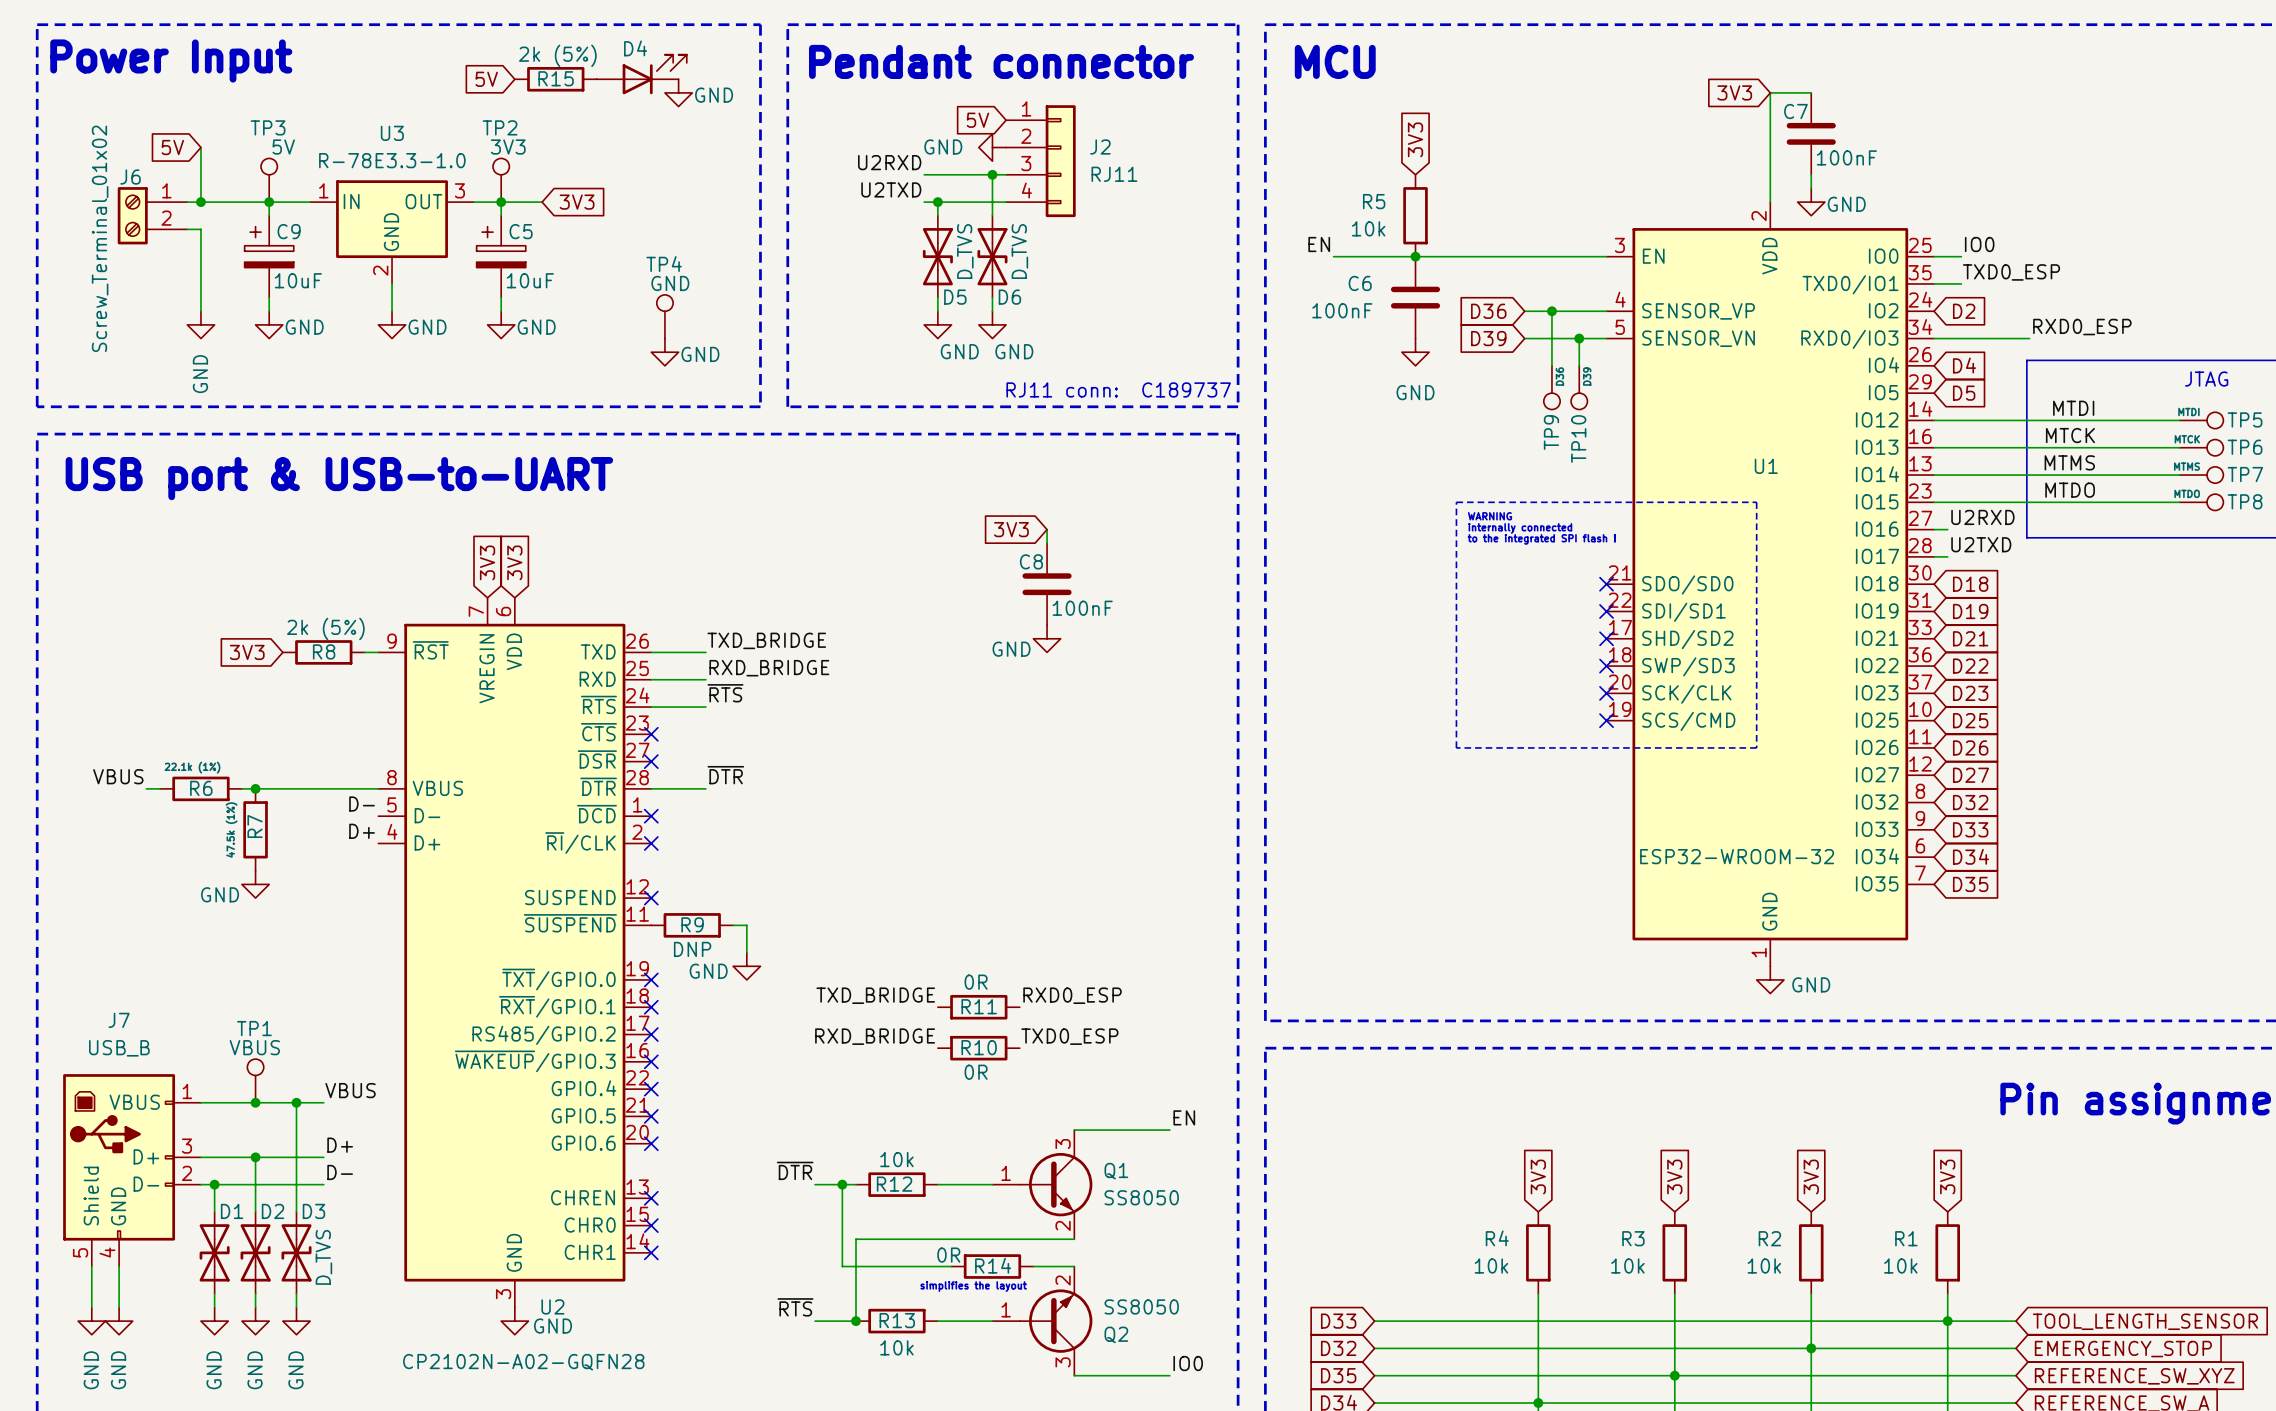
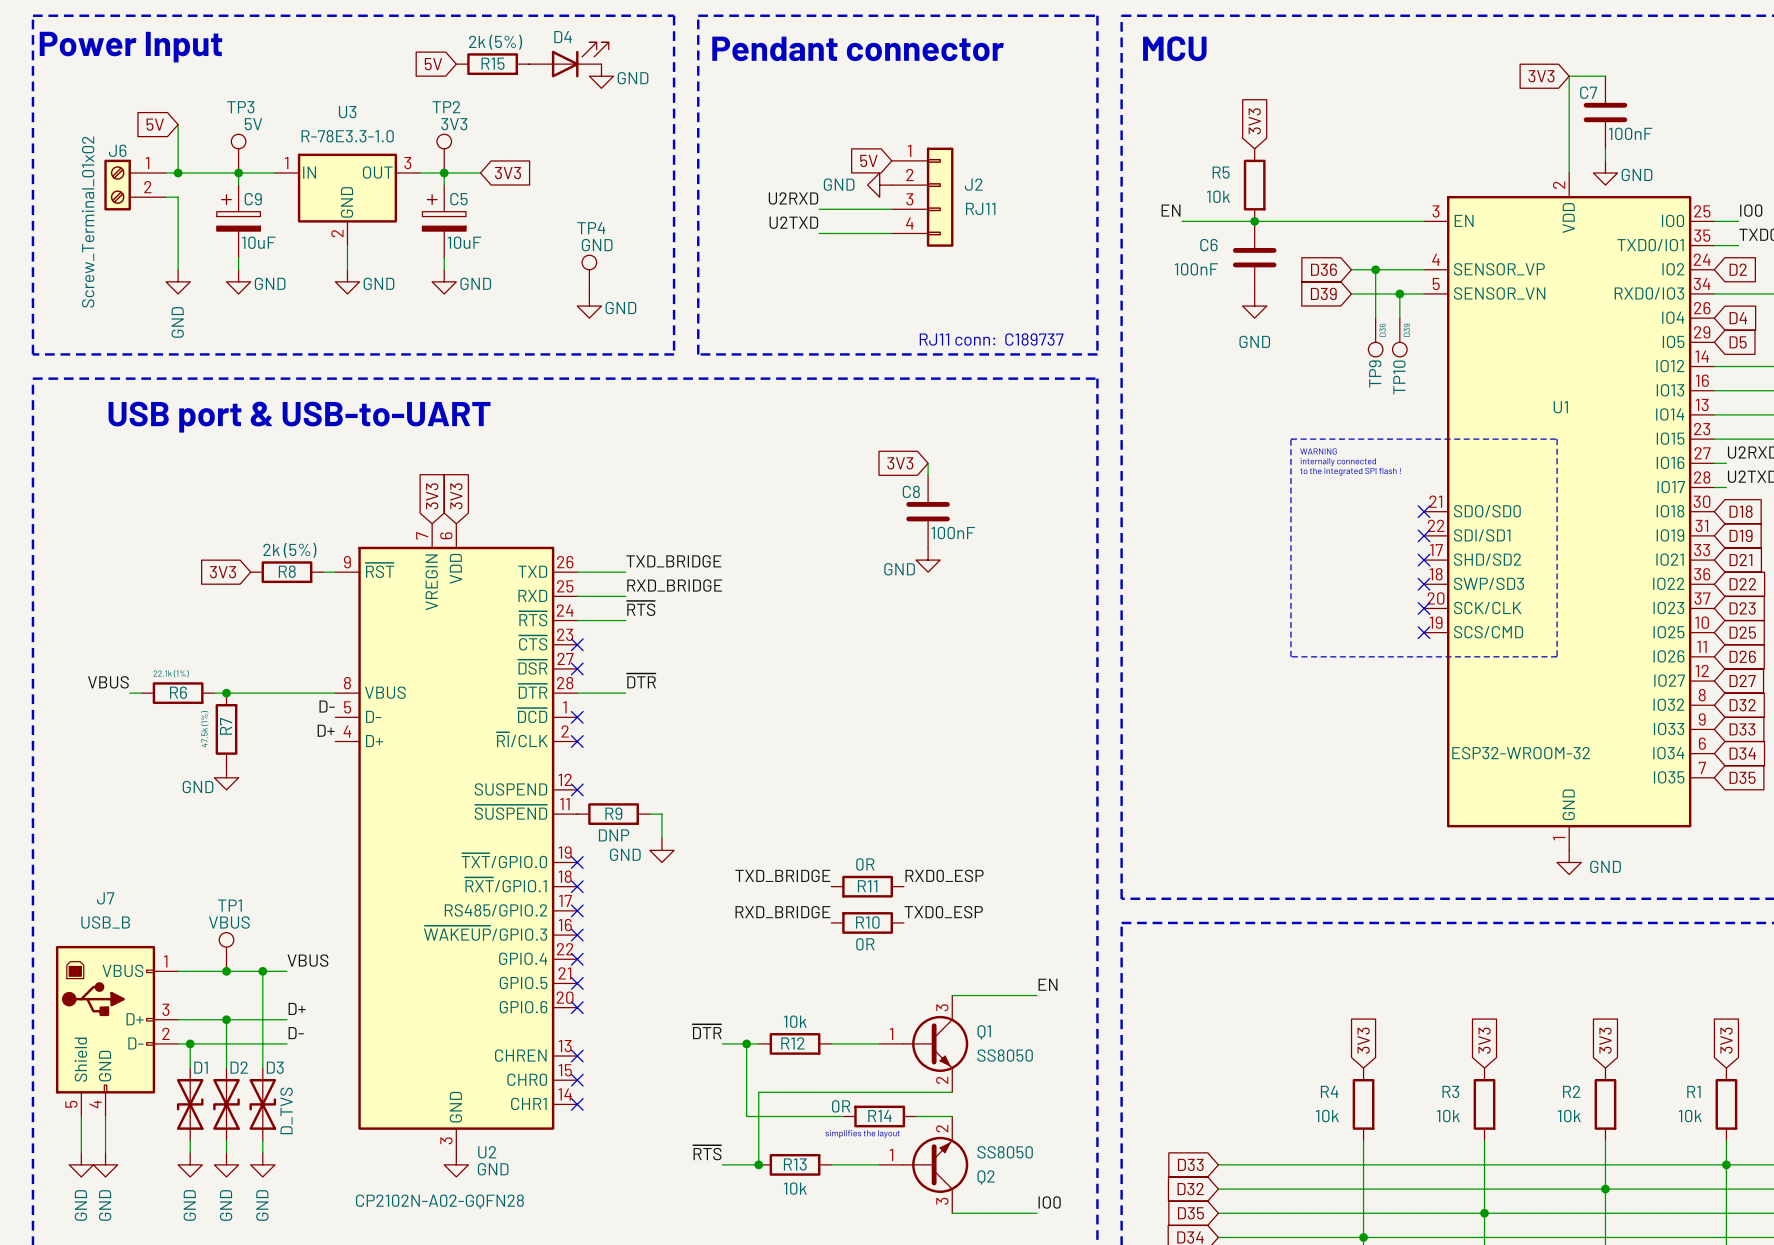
global label position: 5V (977, 120) -> 5V (868, 160)
power symbol: GND (992, 147) -> none
J2 position: (1040, 161) -> (922, 197)
label position: U2RXD (889, 162) -> U2RXD (793, 198)
wire: (924, 174) (1006, 174) -> (819, 209) (891, 209)
wire: (992, 174) (992, 215) -> none
junction: (992, 174) -> none
label position: U2TXD (891, 189) -> U2TXD (793, 222)
wire: (924, 202) (1006, 202) -> (819, 233) (891, 233)
wire: (937, 202) (937, 215) -> none
junction: (937, 202) -> none
power symbol: none -> GND (879, 185)
D5: D_TVS (937, 256) -> none
D6: D_TVS (992, 256) -> none
wire: (937, 297) (937, 311) -> none
wire: (992, 297) (992, 311) -> none
power symbol: GND (937, 324) -> none
power symbol: GND (992, 324) -> none

